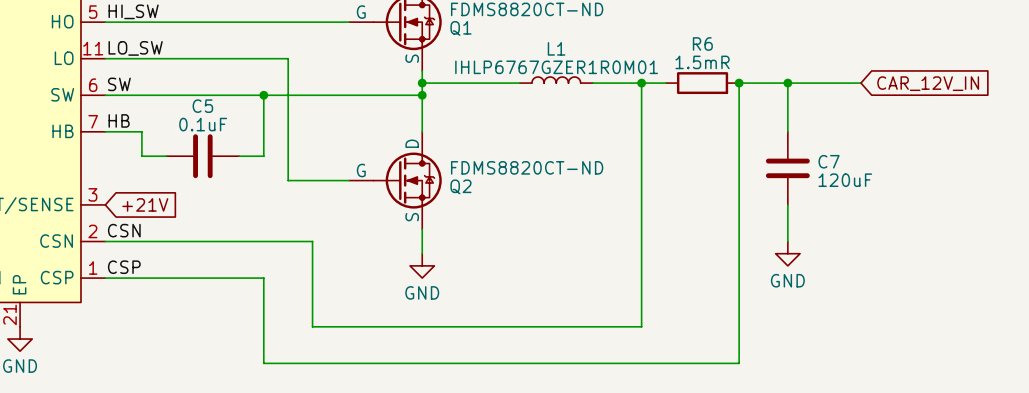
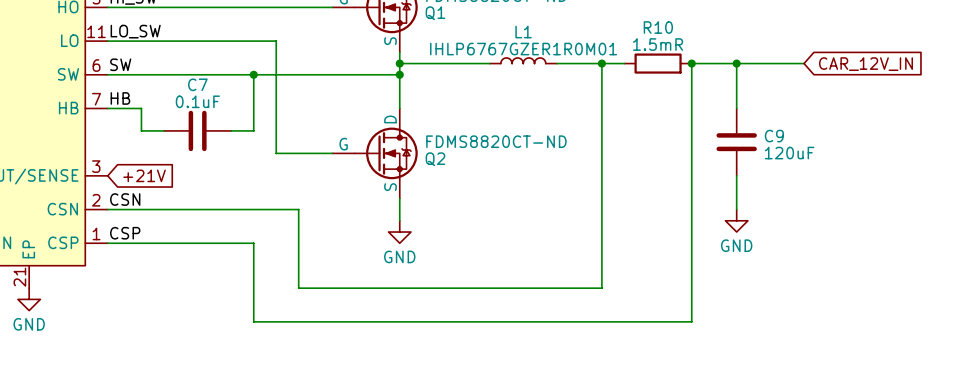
R6 name: R6 (702, 43) -> R10 (658, 27)
C5 name: C5 (202, 106) -> C7 (197, 84)
C7 name: C7 (829, 161) -> C9 (774, 136)

